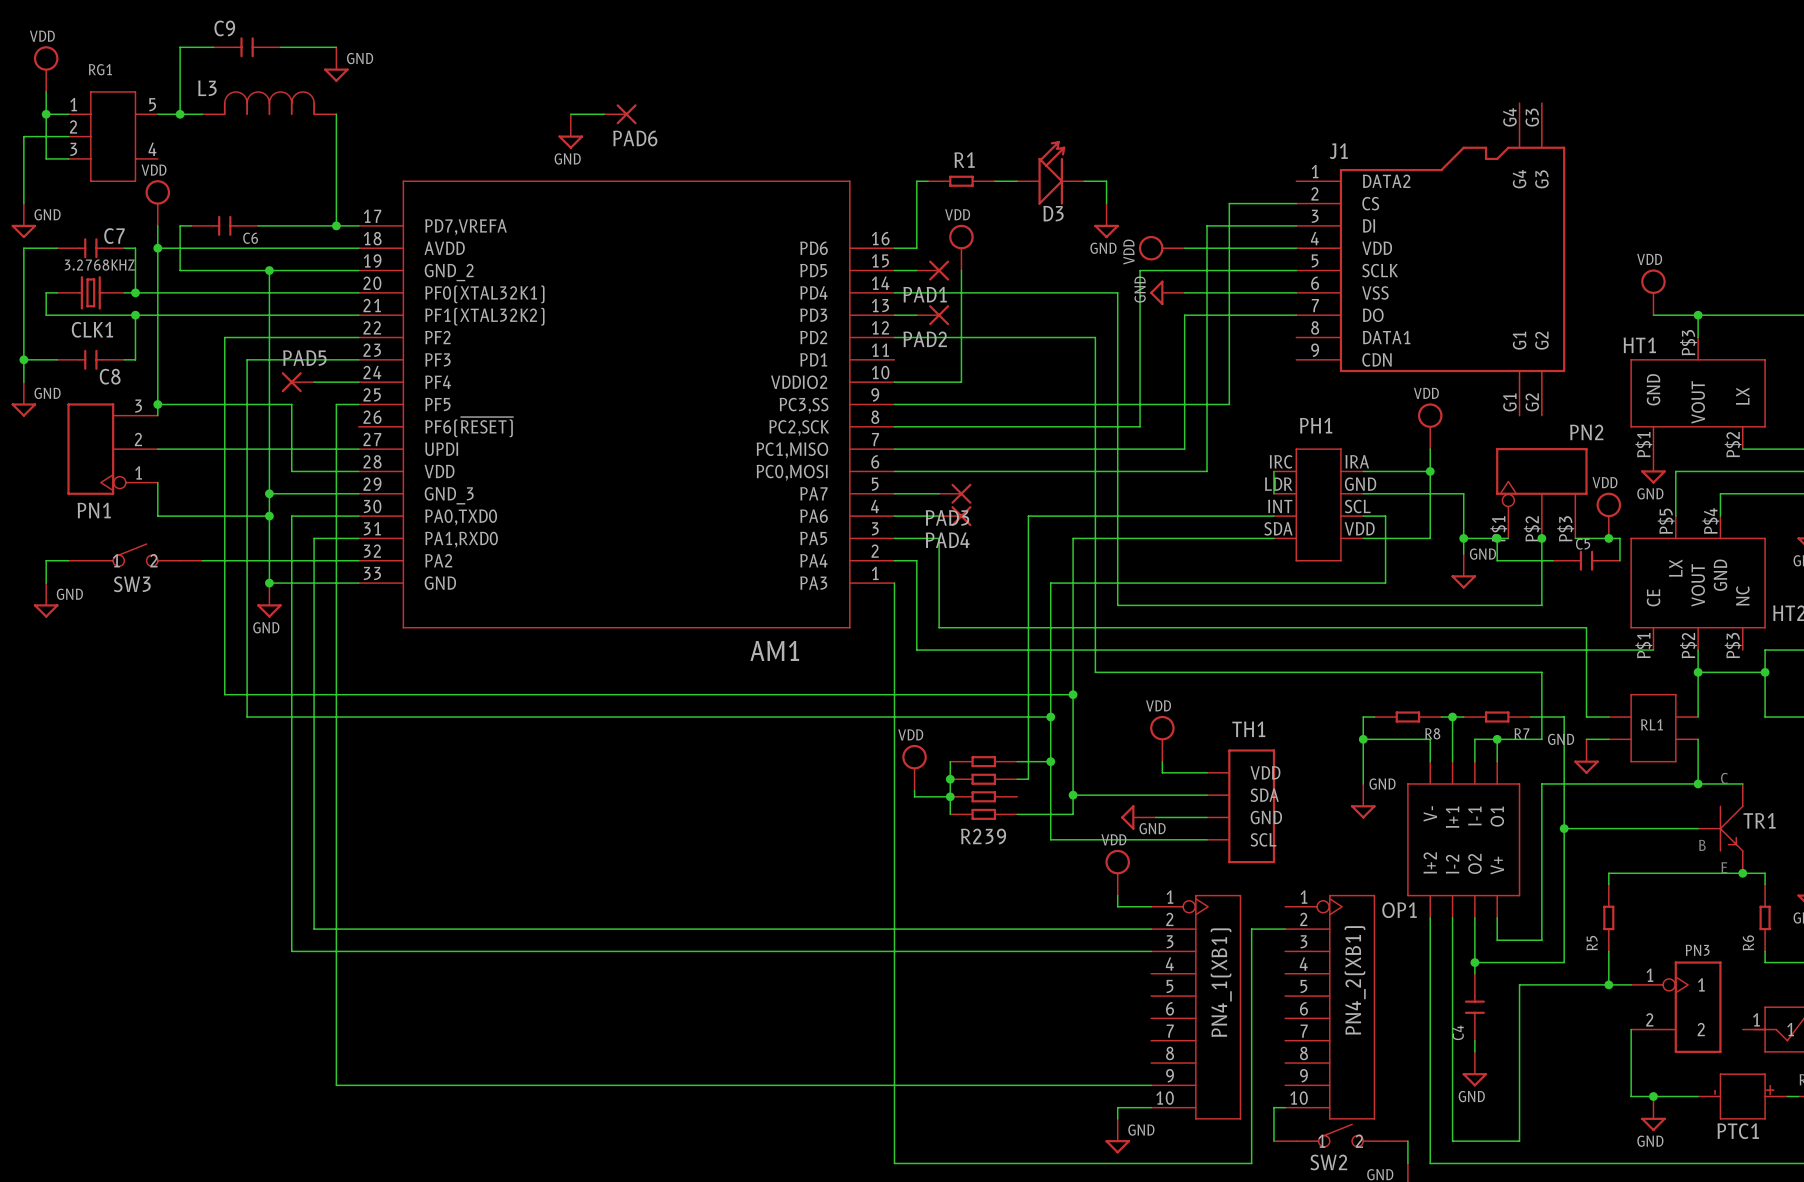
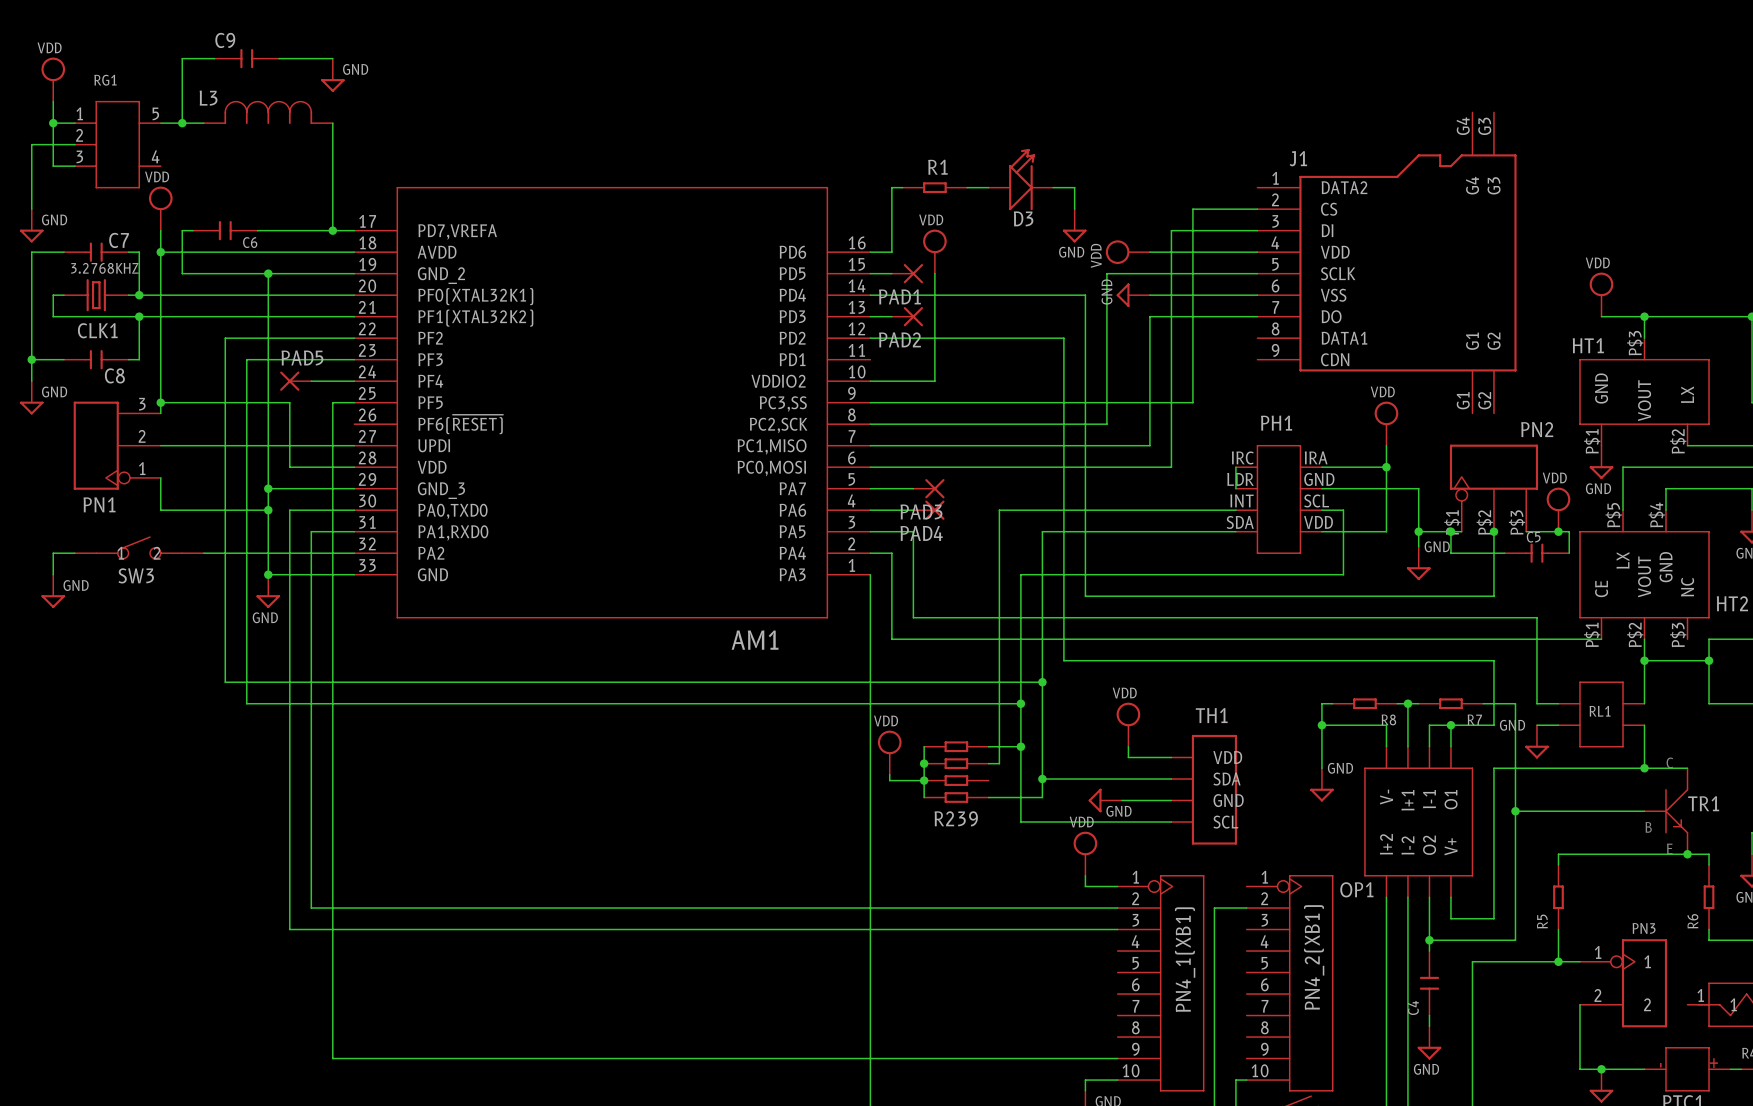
wire: (570, 114) (604, 114) -> none
PAD6: (620, 114) -> none
power symbol: GND (570, 131) -> none

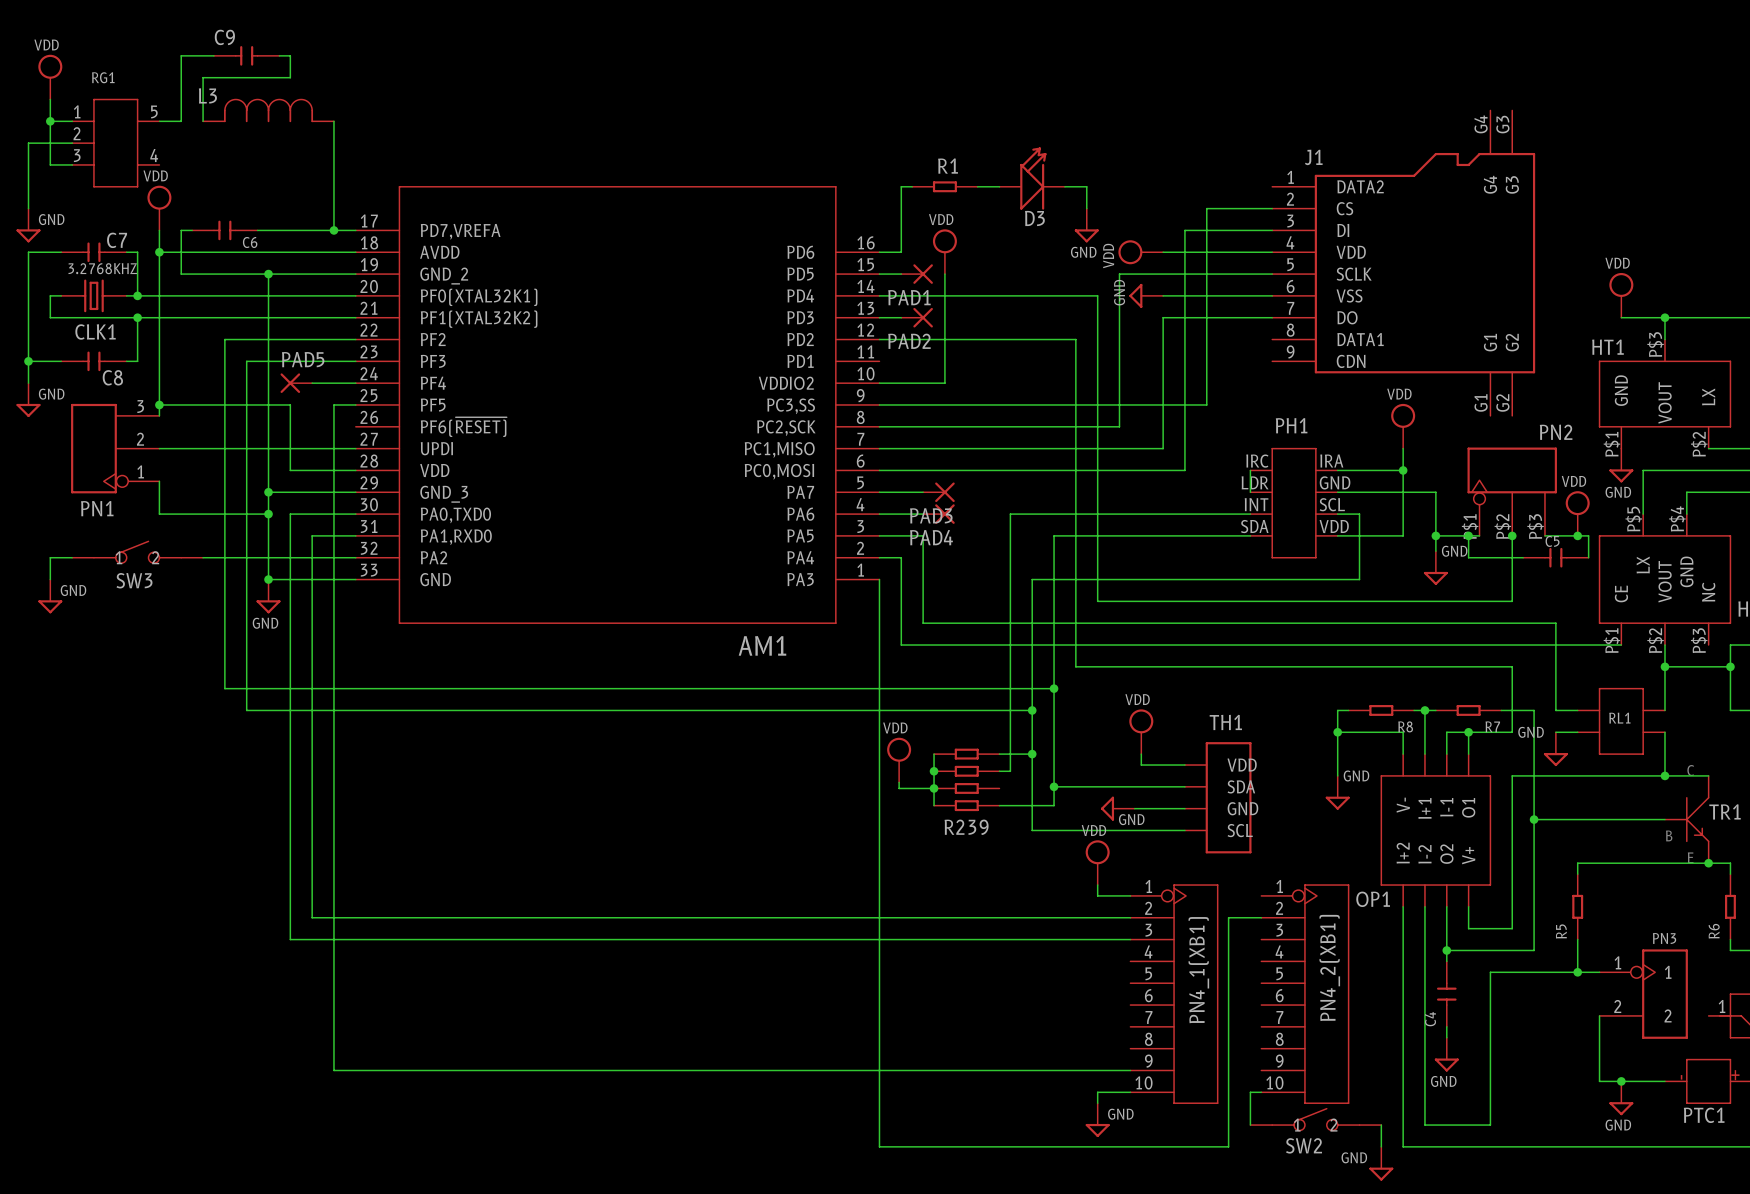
wire: (289, 58) (332, 58) -> none
power symbol: GND (332, 75) -> none
wire: (182, 123) (203, 123) -> (290, 55) (290, 77) (203, 77) (203, 121)
junction: (182, 123) -> none

